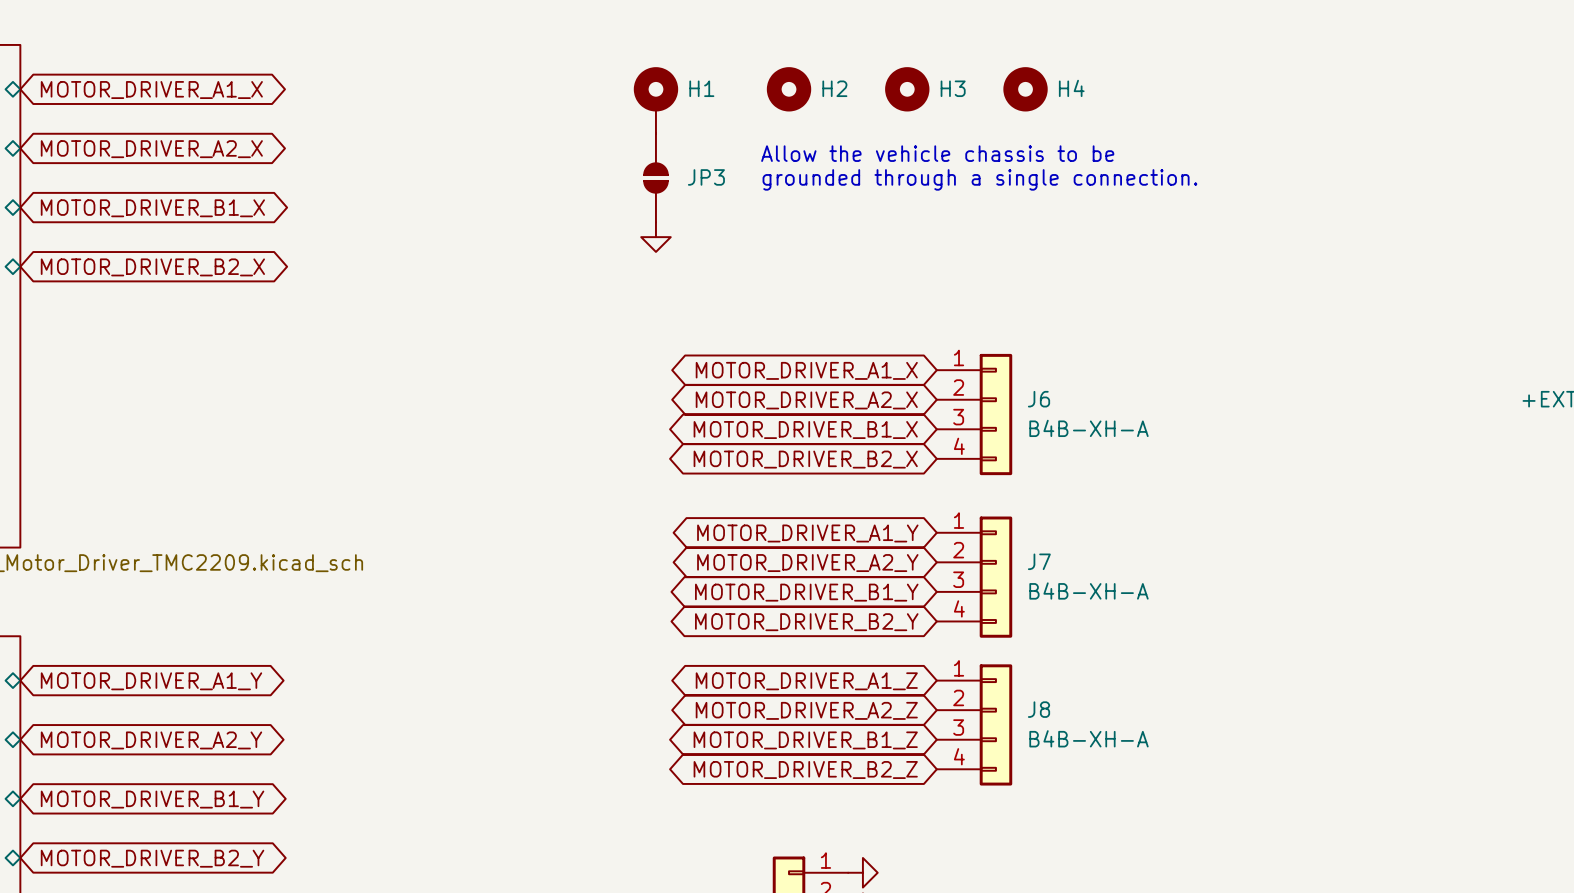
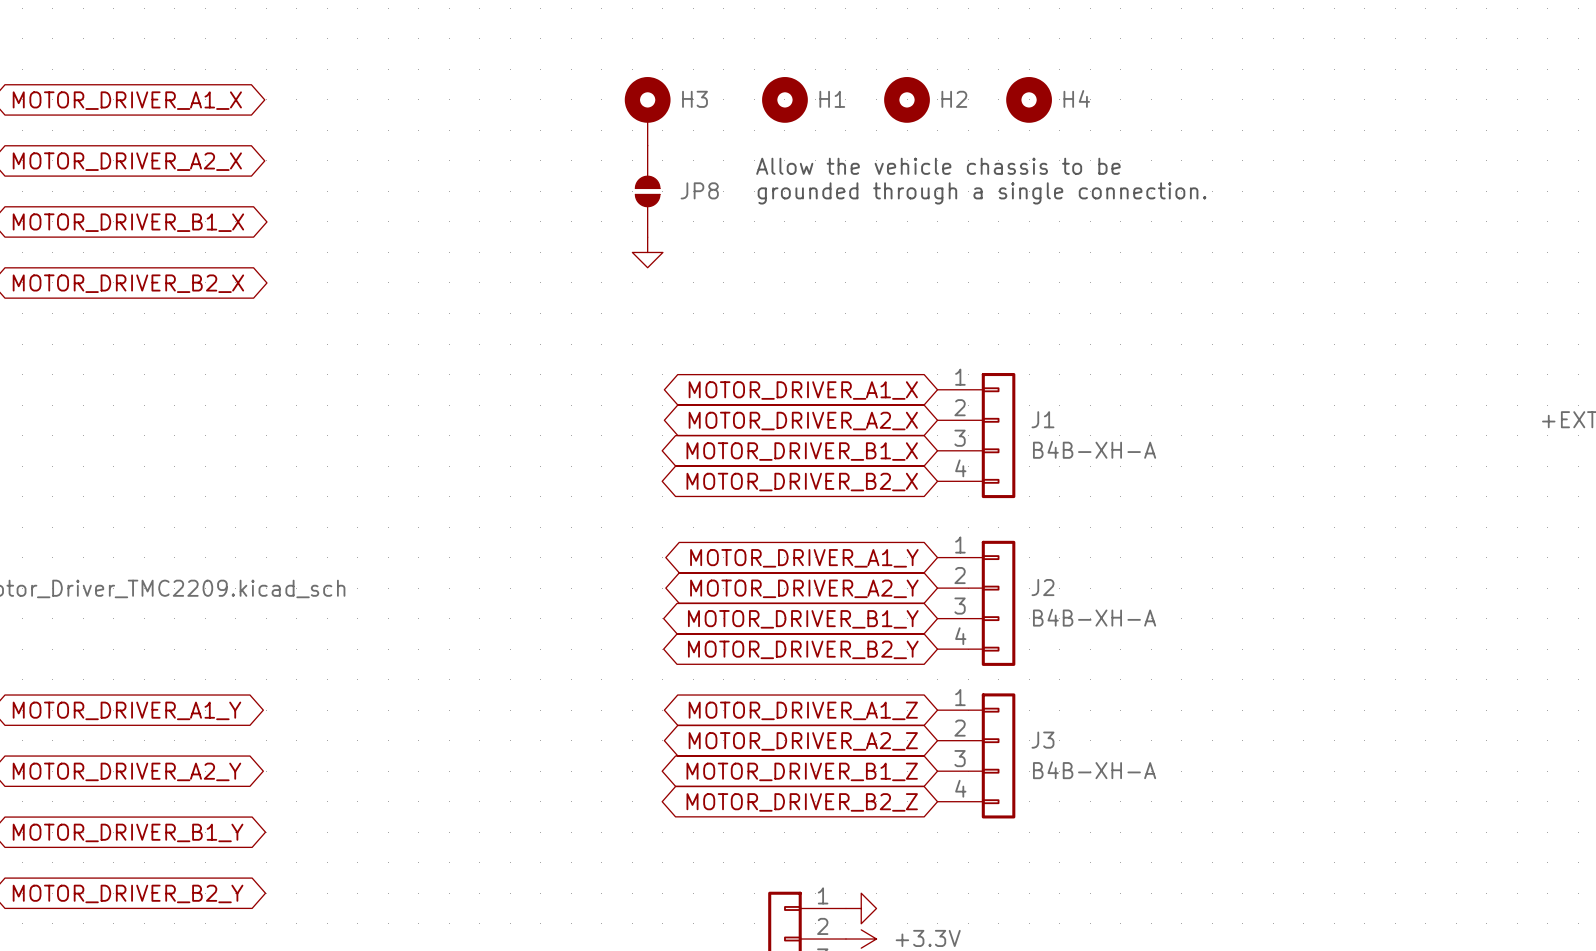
H1 name: H1 (701, 88) -> H3 (694, 99)
H2 name: H2 (834, 88) -> H1 (832, 99)
H3 name: H3 (953, 88) -> H2 (954, 99)
JP3 name: JP3 (706, 177) -> JP8 (699, 190)
J6 name: J6 (1039, 399) -> J1 (1042, 419)
J7 name: J7 (1039, 561) -> J2 (1042, 587)
J8 name: J8 (1039, 709) -> J3 (1042, 740)

